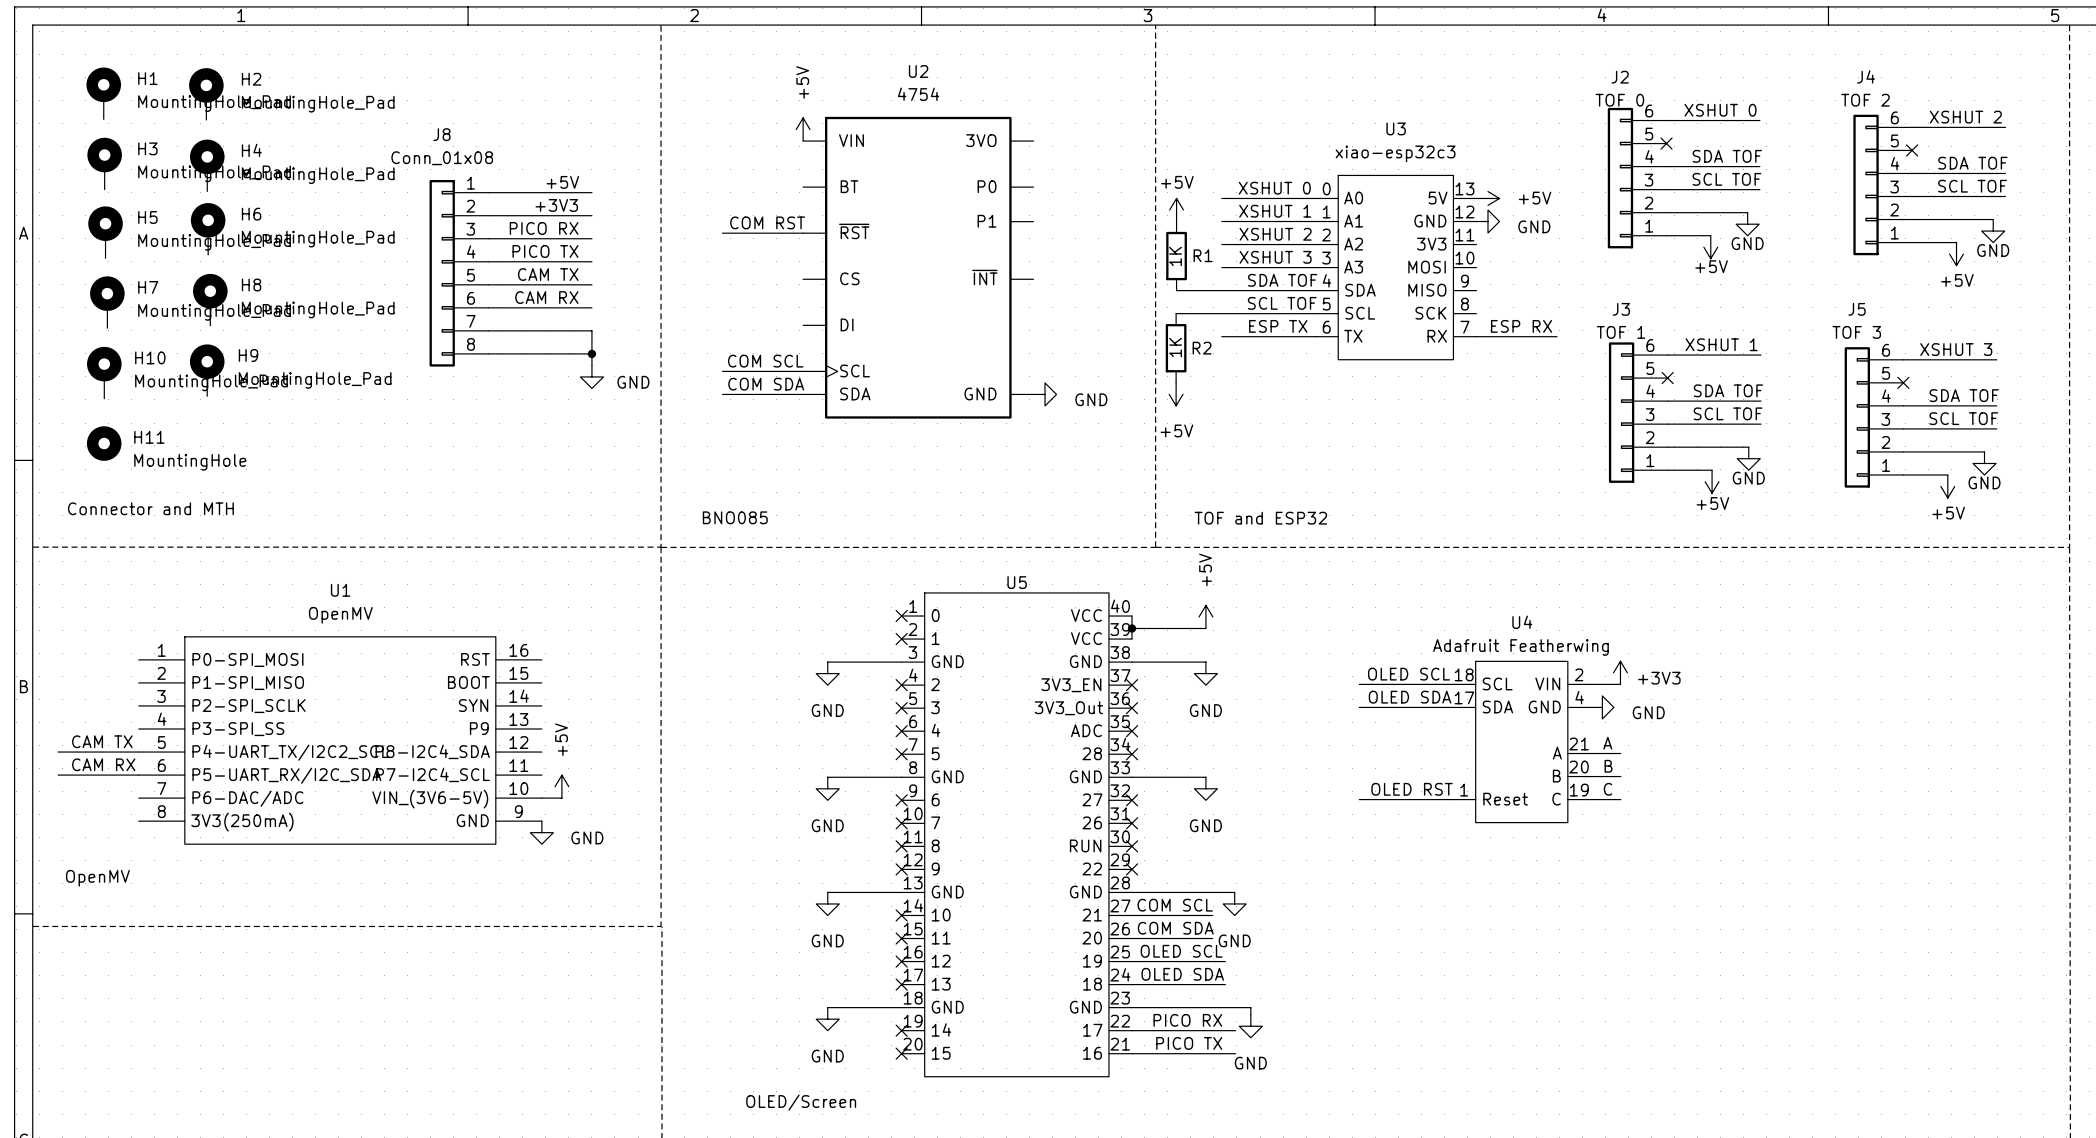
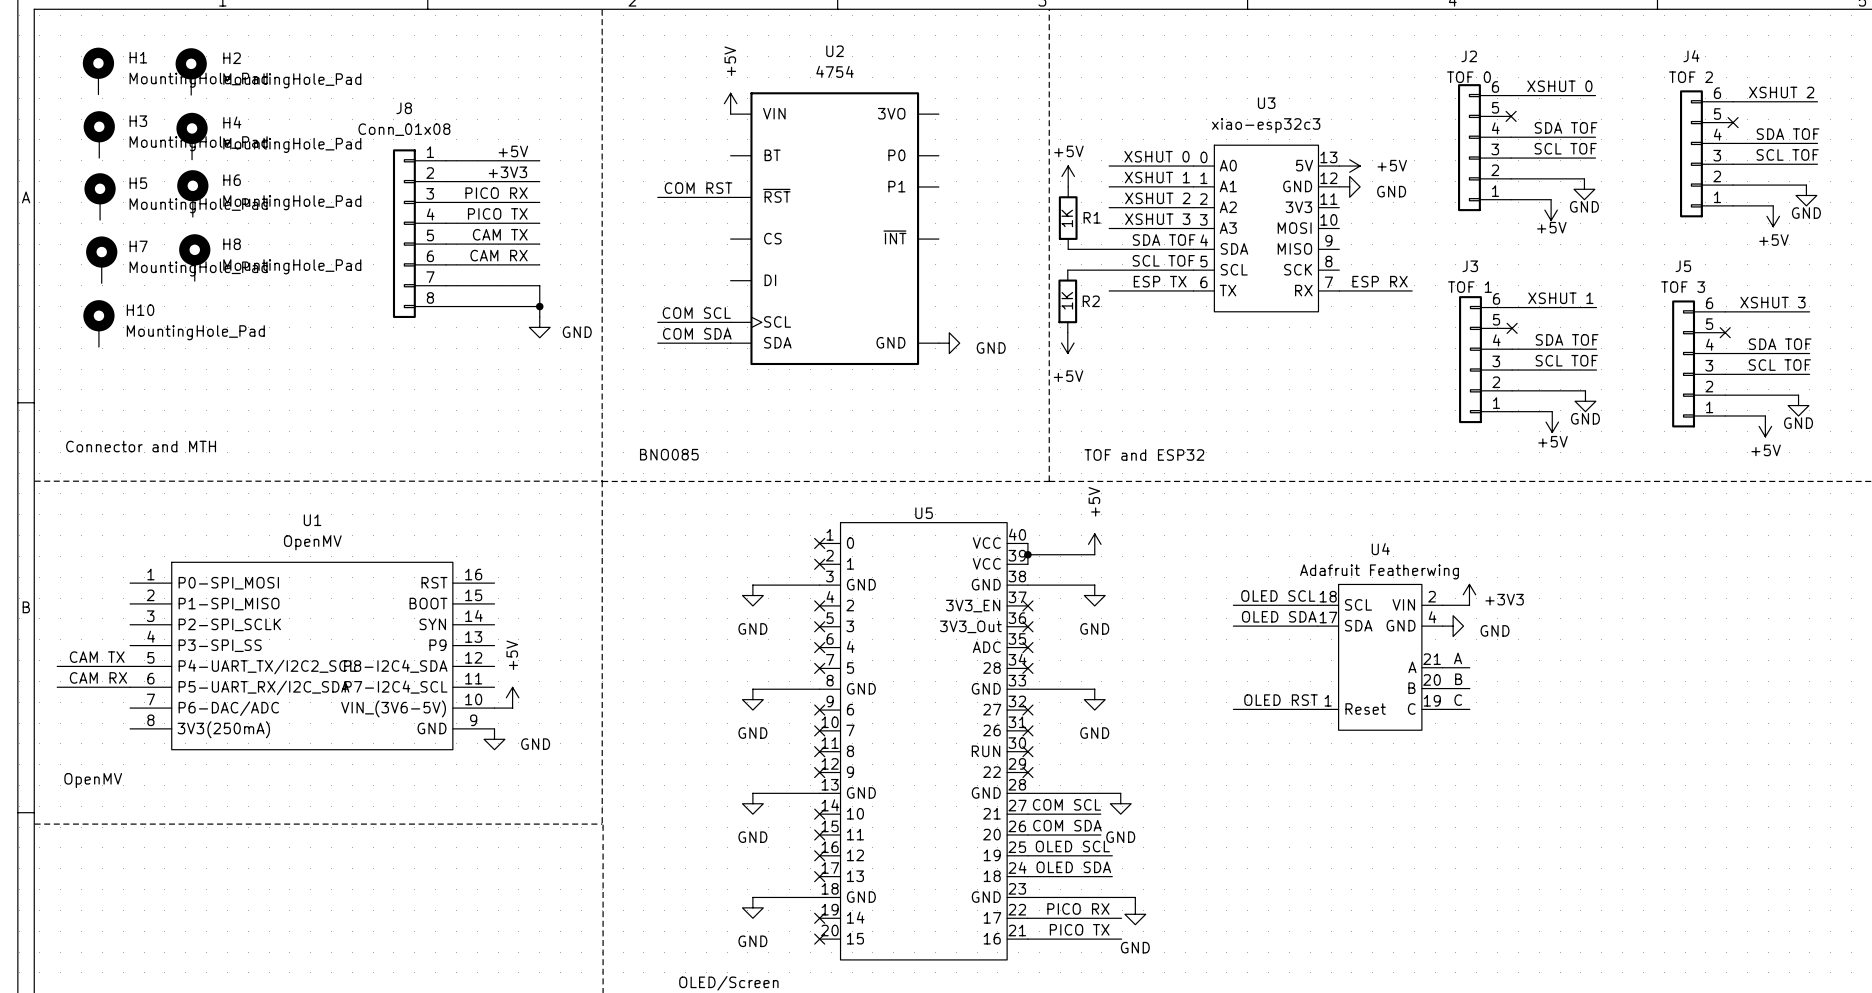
H9: MountingHole_Pad (207, 370) -> none
H11: MountingHole (104, 443) -> none

